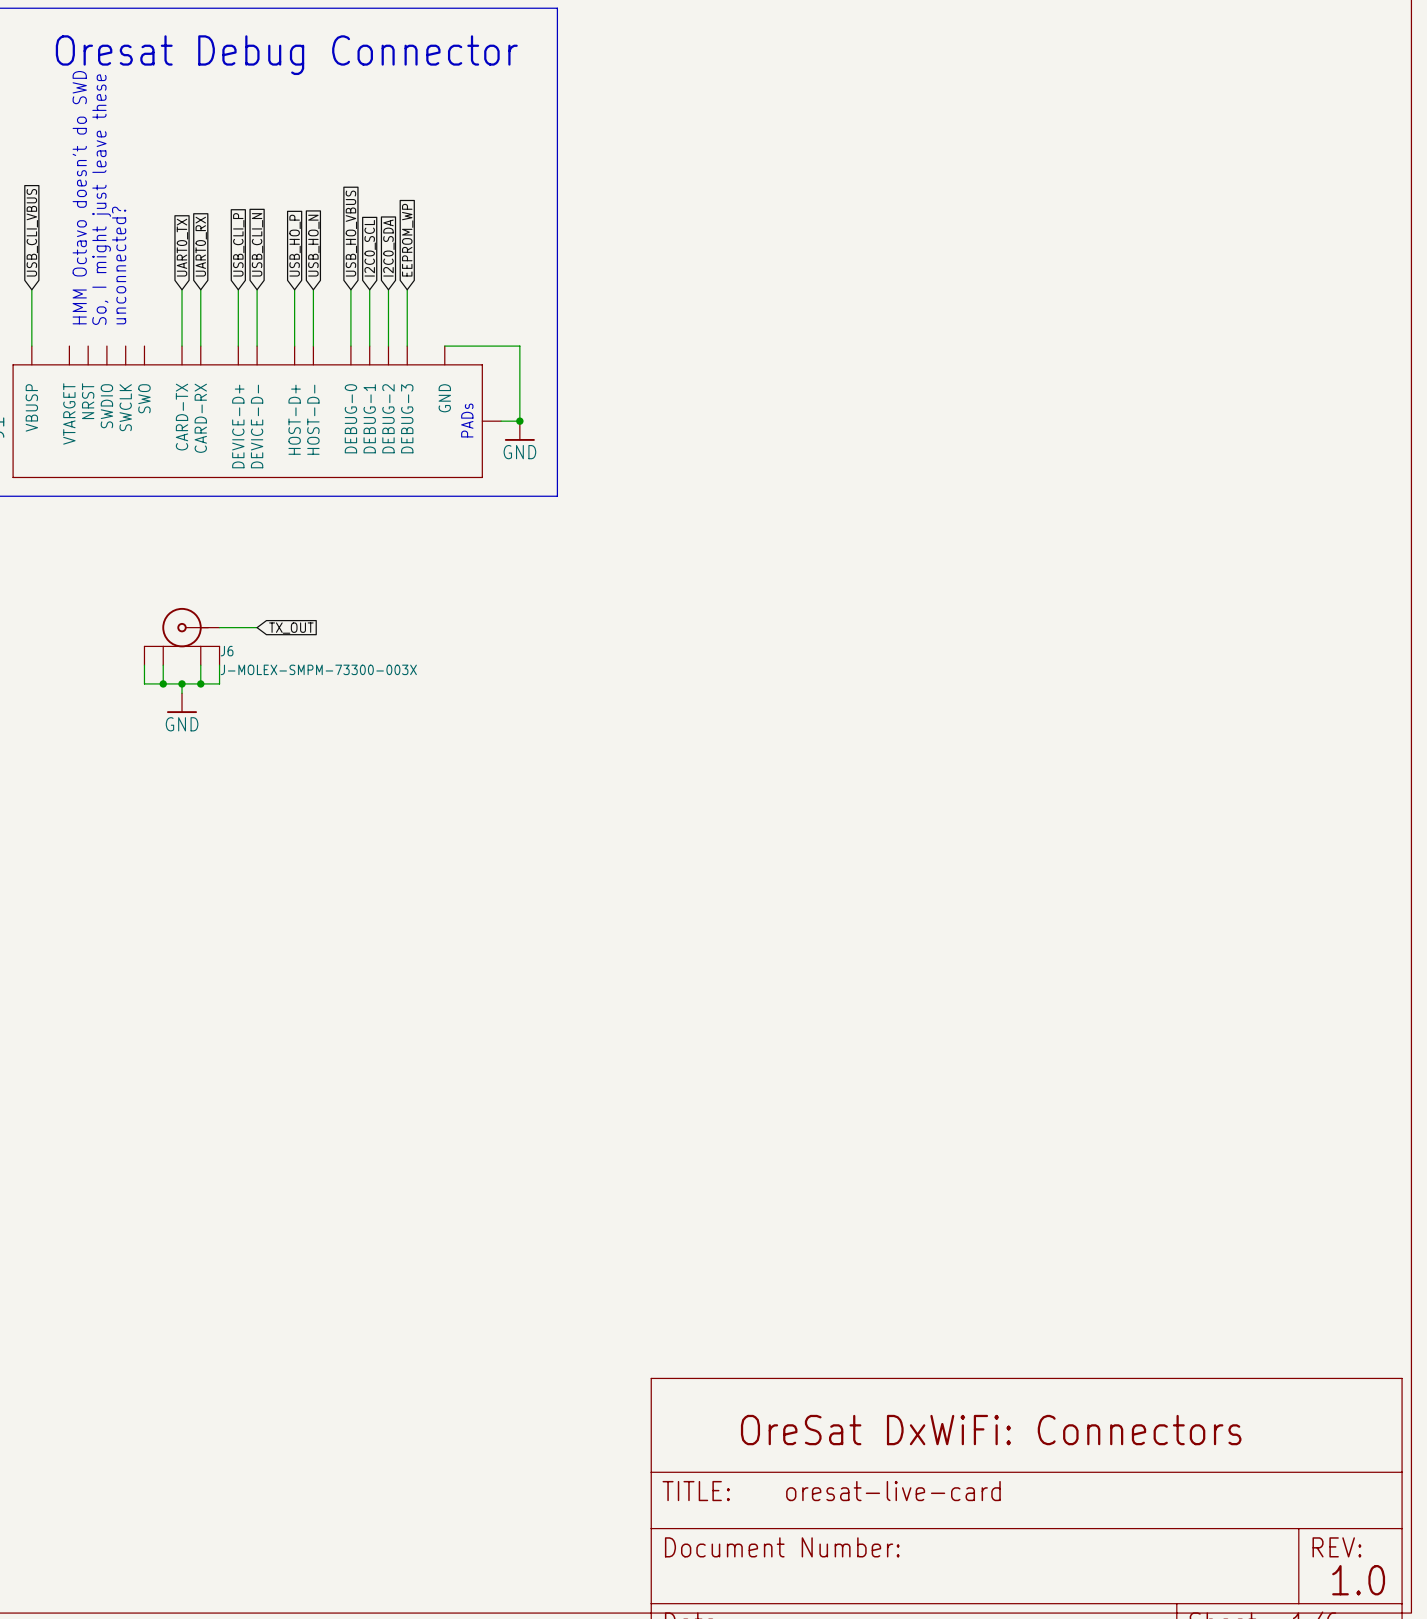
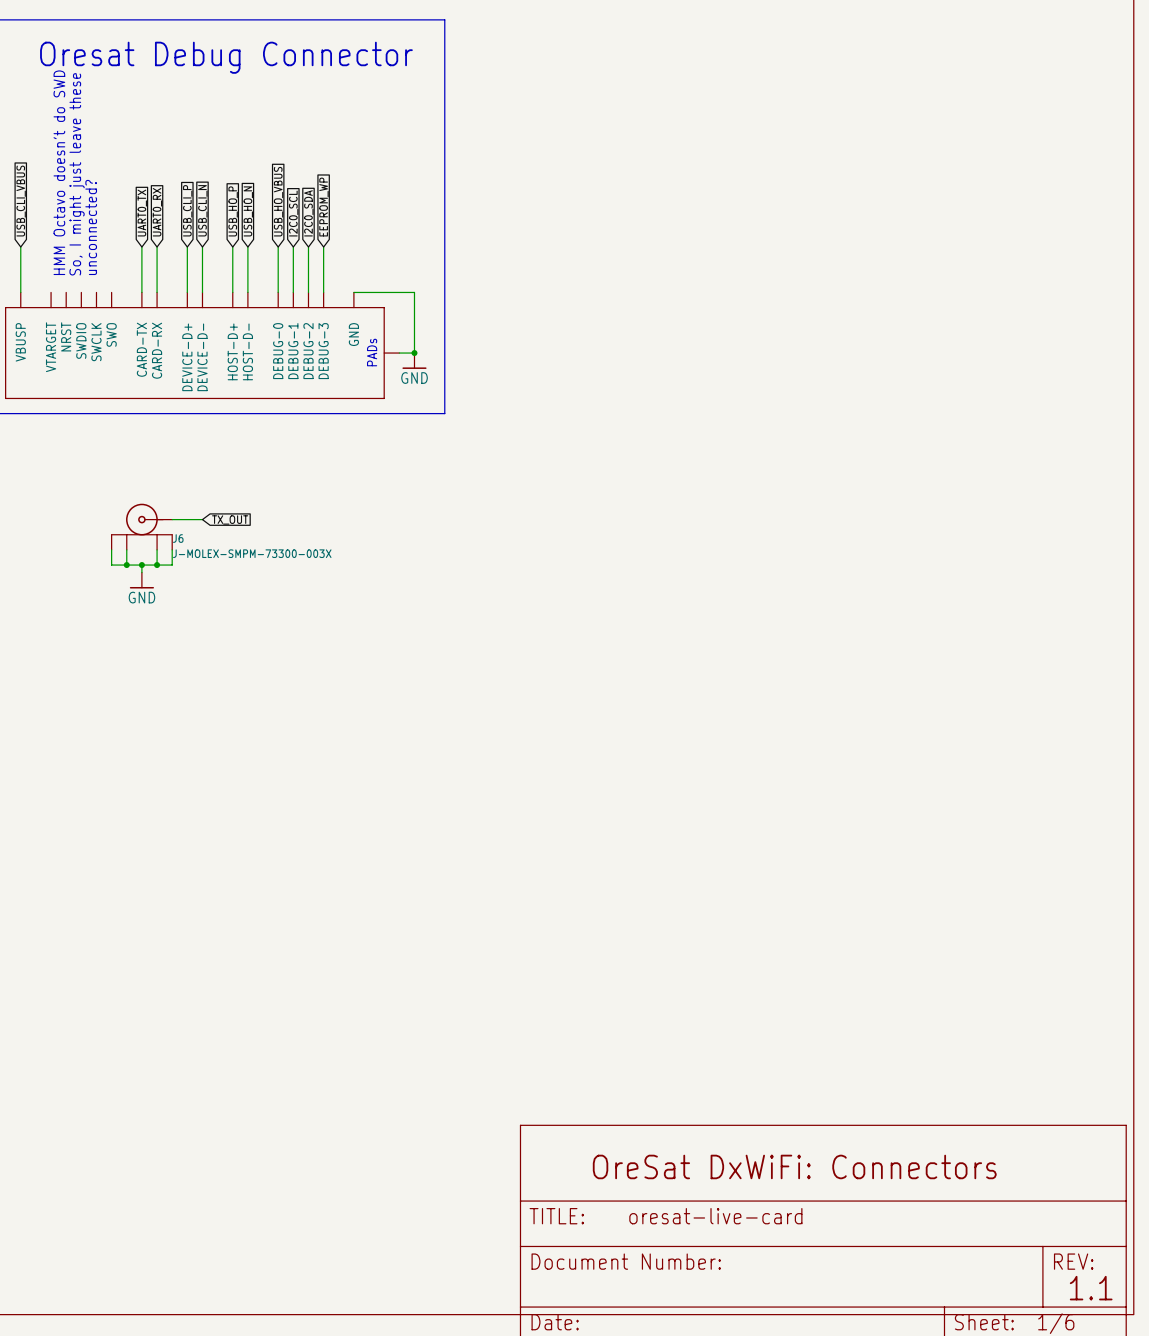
text: 1.0 (1358, 1580) -> 1.1 (1091, 1288)

